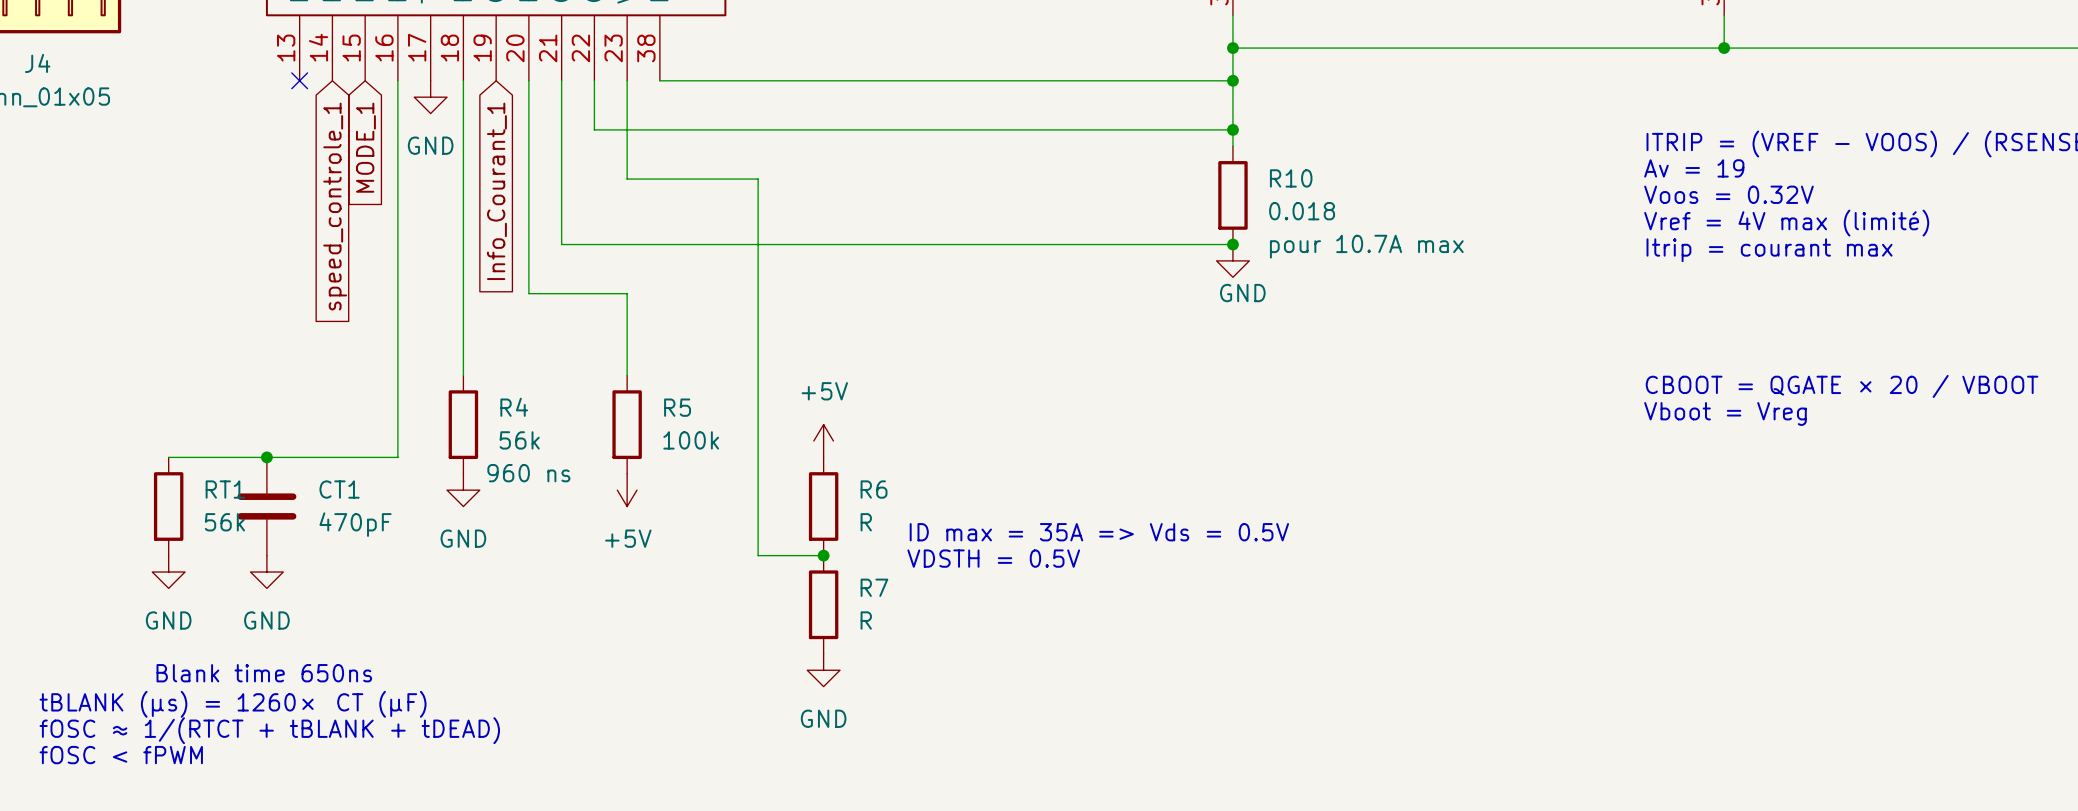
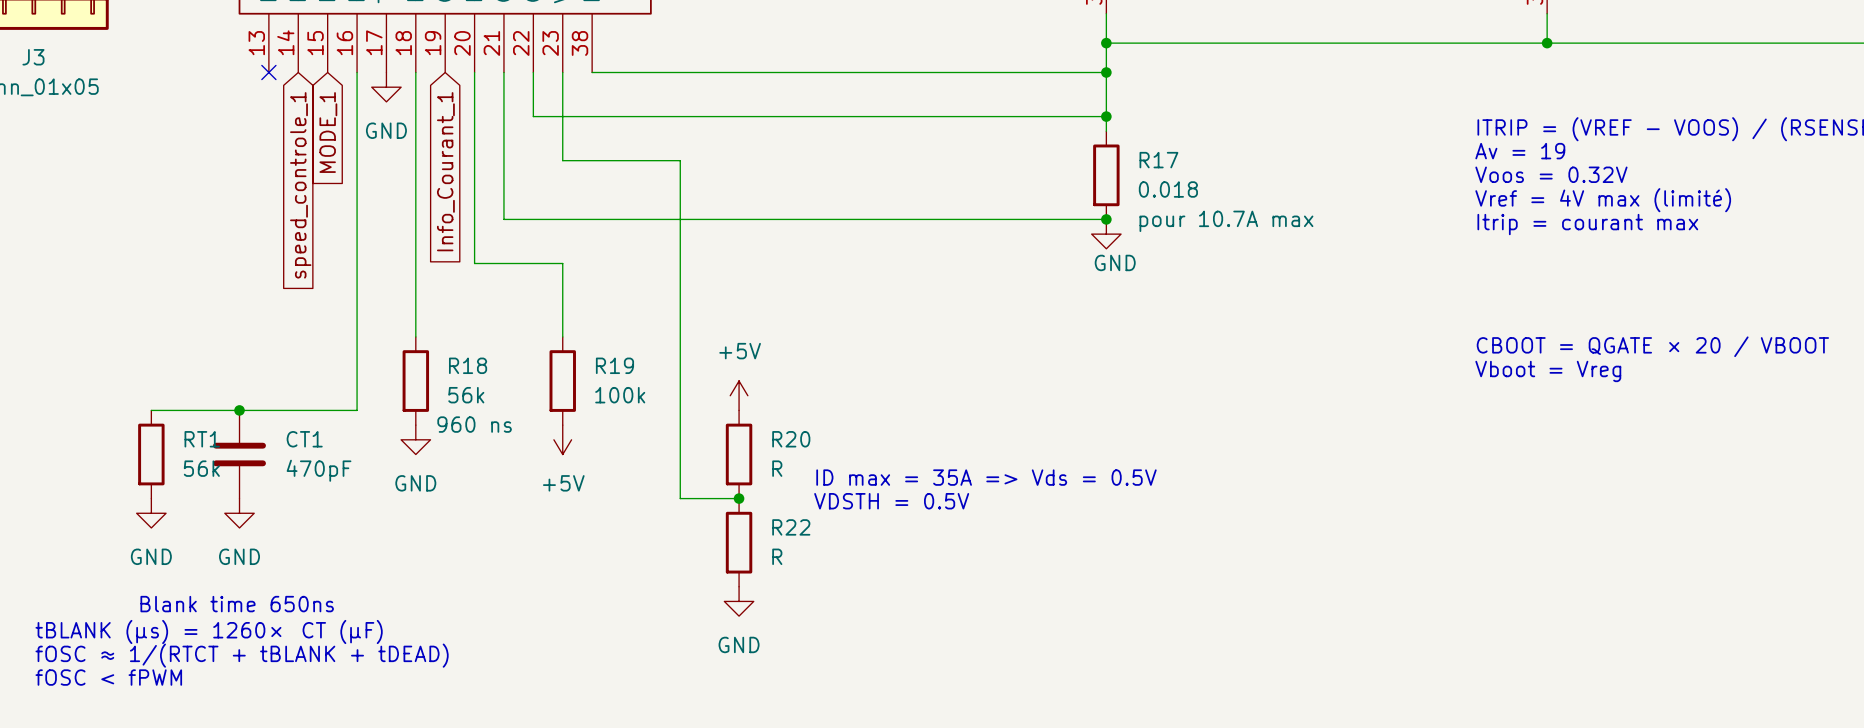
J4 name: J4 (37, 63) -> J3 (33, 57)
R10 name: R10 (1291, 178) -> R17 (1158, 160)
R4 name: R4 (514, 407) -> R18 (468, 365)
R5 name: R5 (677, 407) -> R19 (614, 365)
R6 name: R6 (874, 489) -> R20 (791, 439)
R7 name: R7 (874, 587) -> R22 (791, 527)

